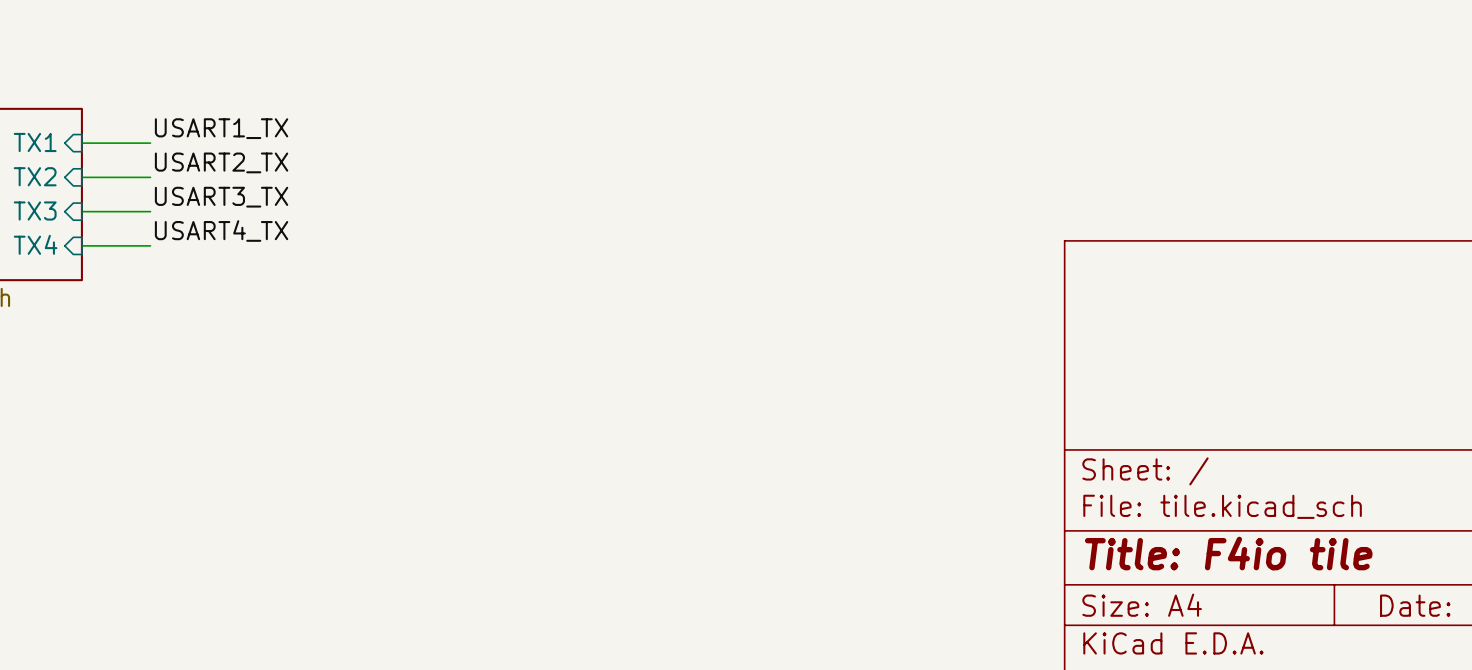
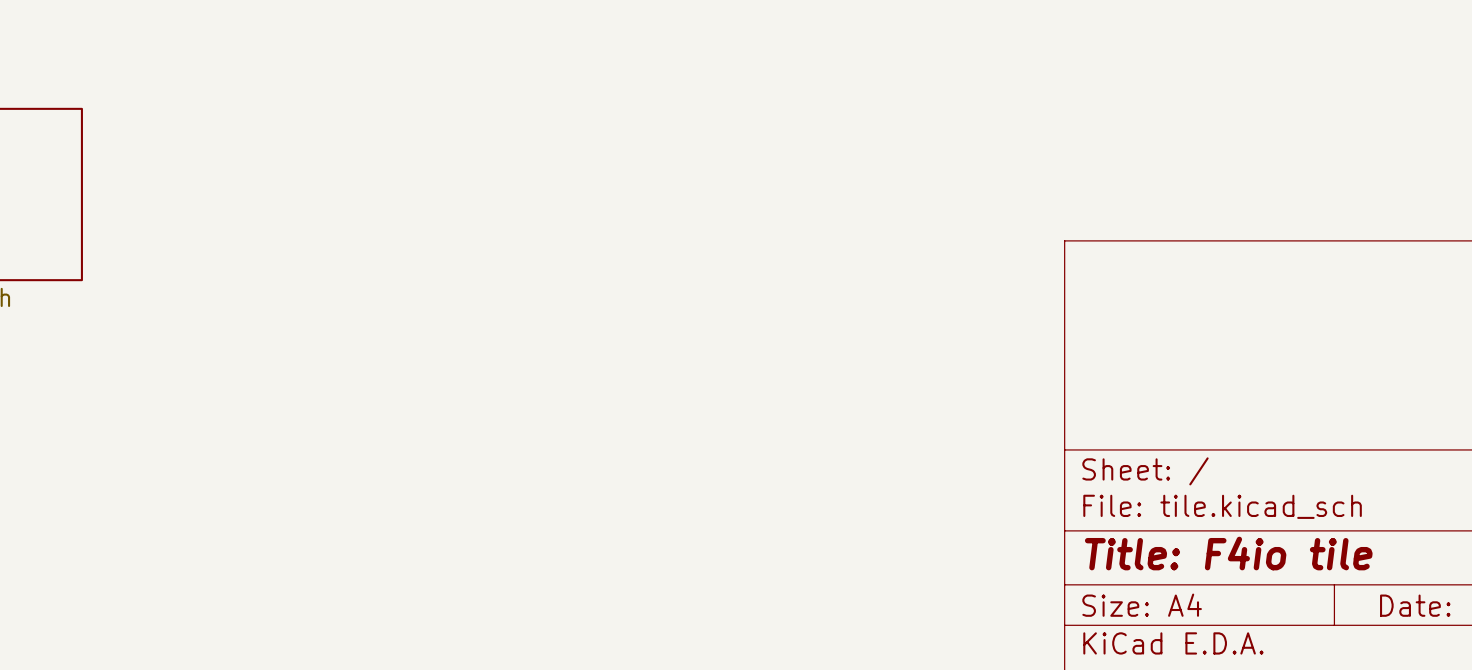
label: USART1_TX (221, 128) -> none
sheet pin: TX1 (35, 142) -> none
wire: (81, 143) (150, 143) -> none
label: USART2_TX (221, 162) -> none
sheet pin: TX2 (35, 176) -> none
wire: (81, 177) (150, 177) -> none
label: USART3_TX (221, 197) -> none
sheet pin: TX3 (35, 210) -> none
wire: (81, 211) (150, 211) -> none
label: USART4_TX (221, 231) -> none
sheet pin: TX4 (35, 244) -> none
wire: (81, 245) (150, 245) -> none

